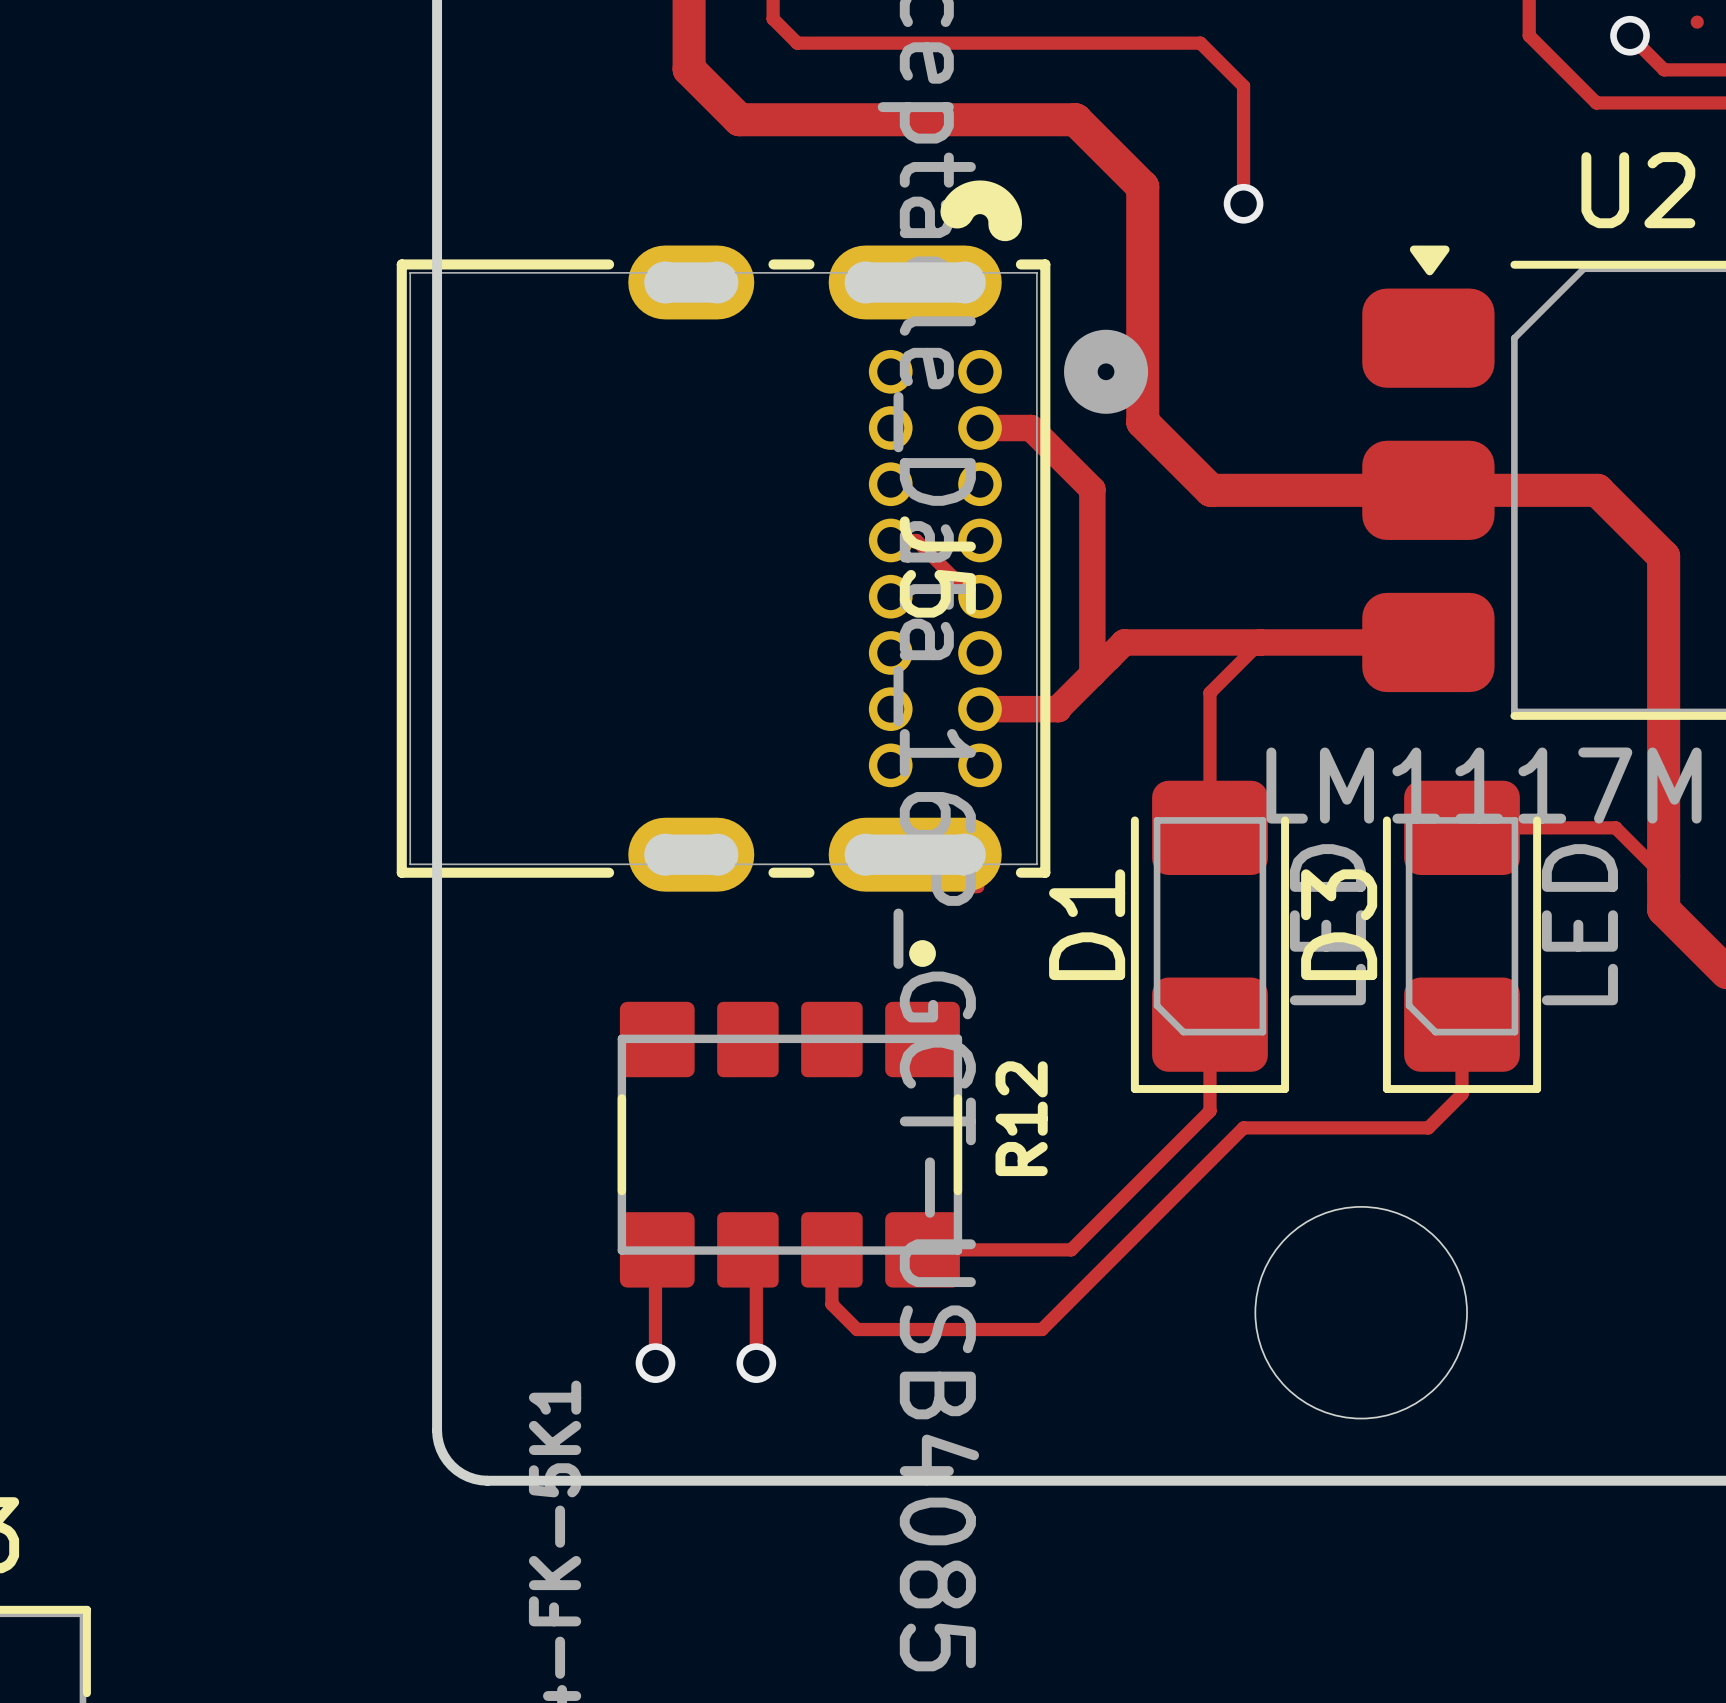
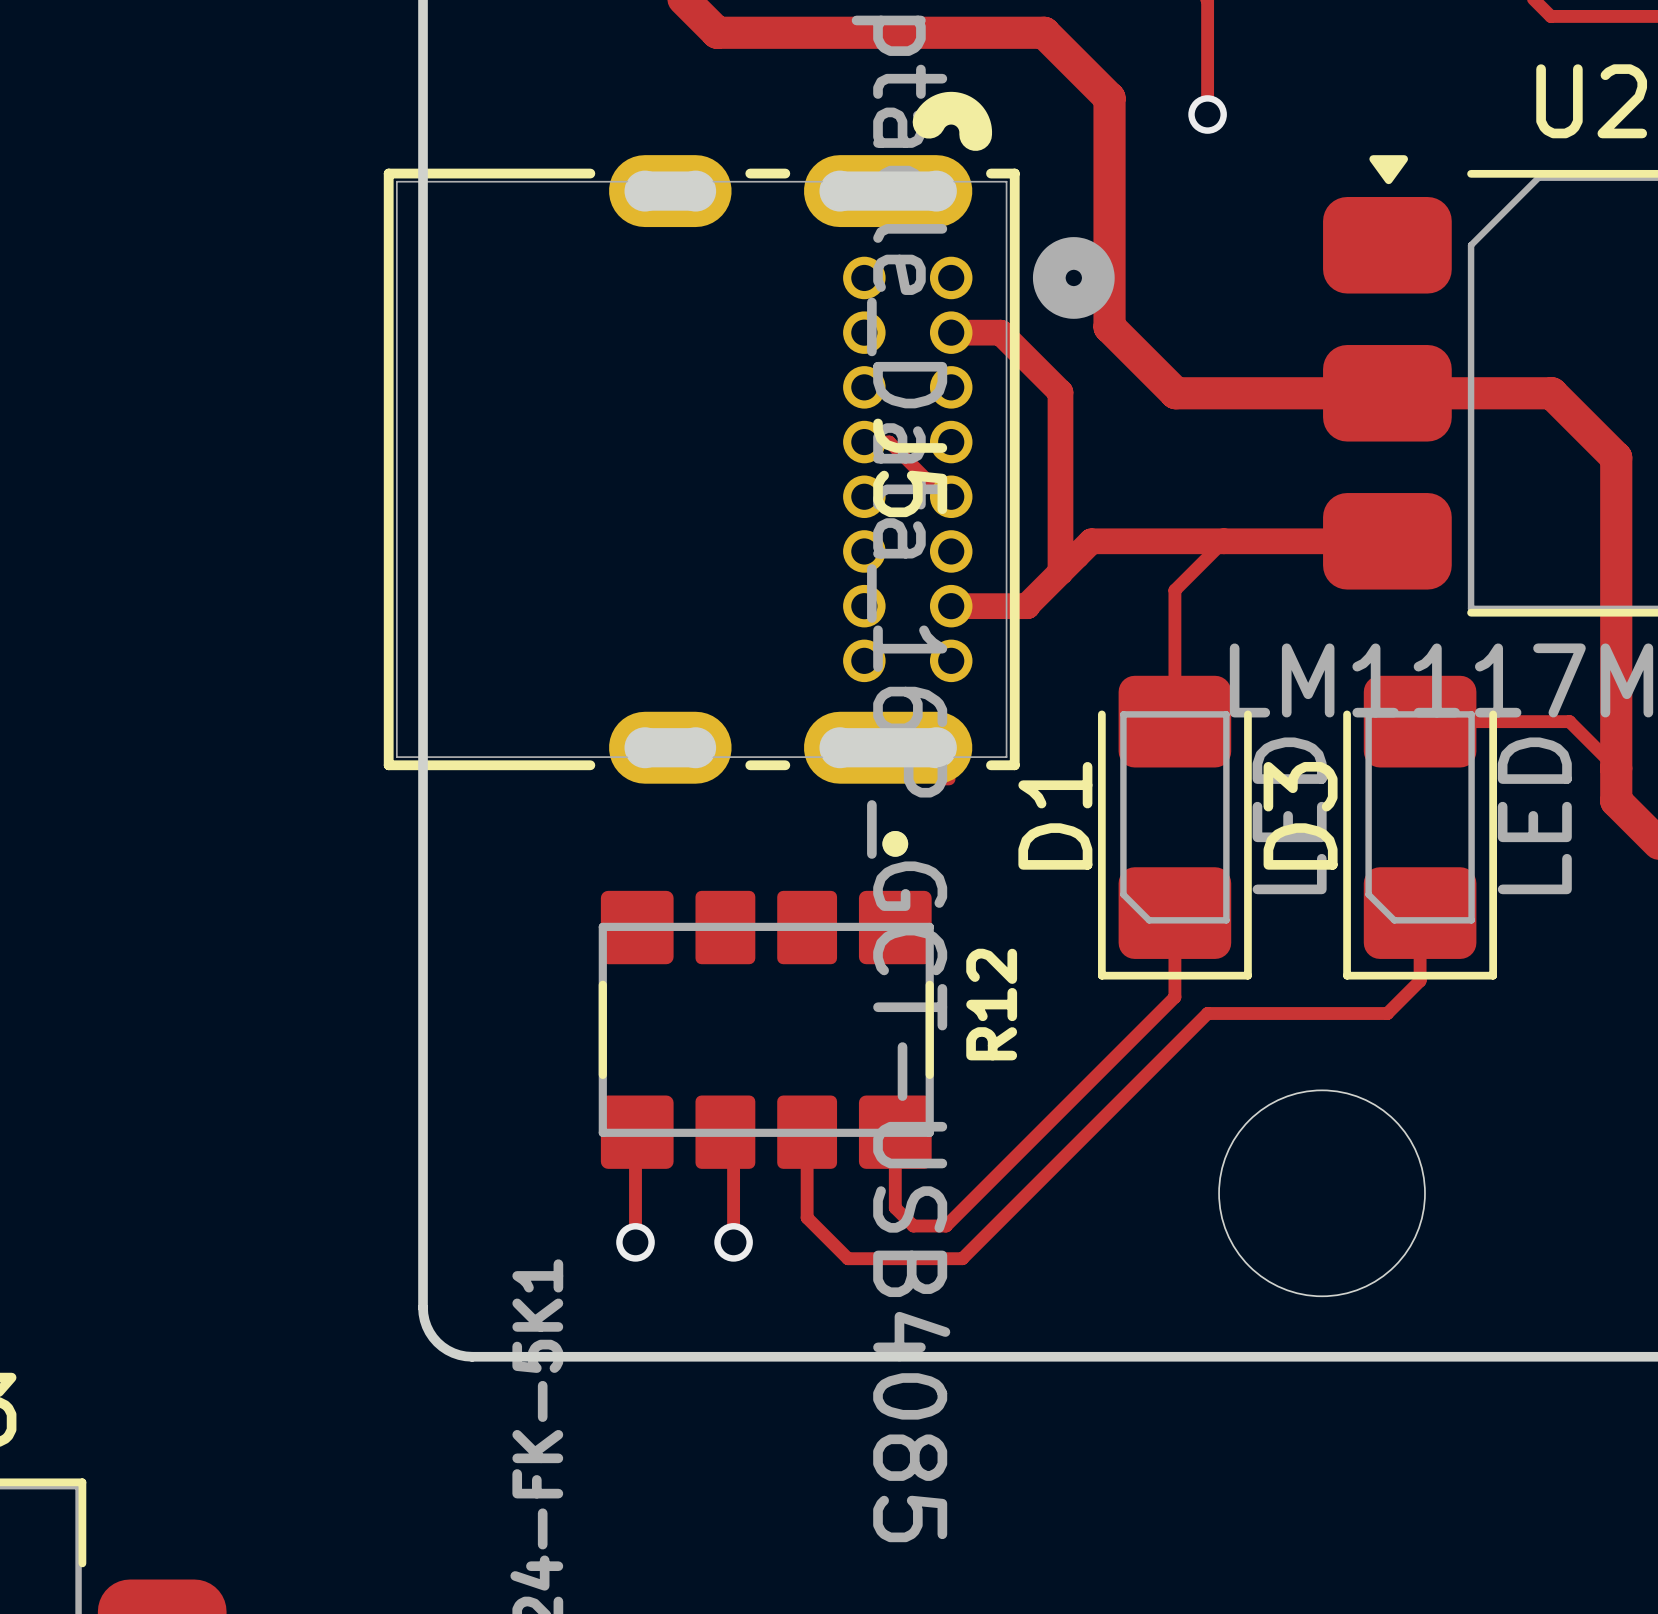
track: (922, 1249) (1071, 1249) -> (895, 1132) (895, 1207) (913, 1226) (946, 1226) (1039, 1132)
track: (831, 1304) (857, 1329) (1041, 1329) -> (807, 1185) (807, 1217) (848, 1258) (962, 1258) (1011, 1209)

